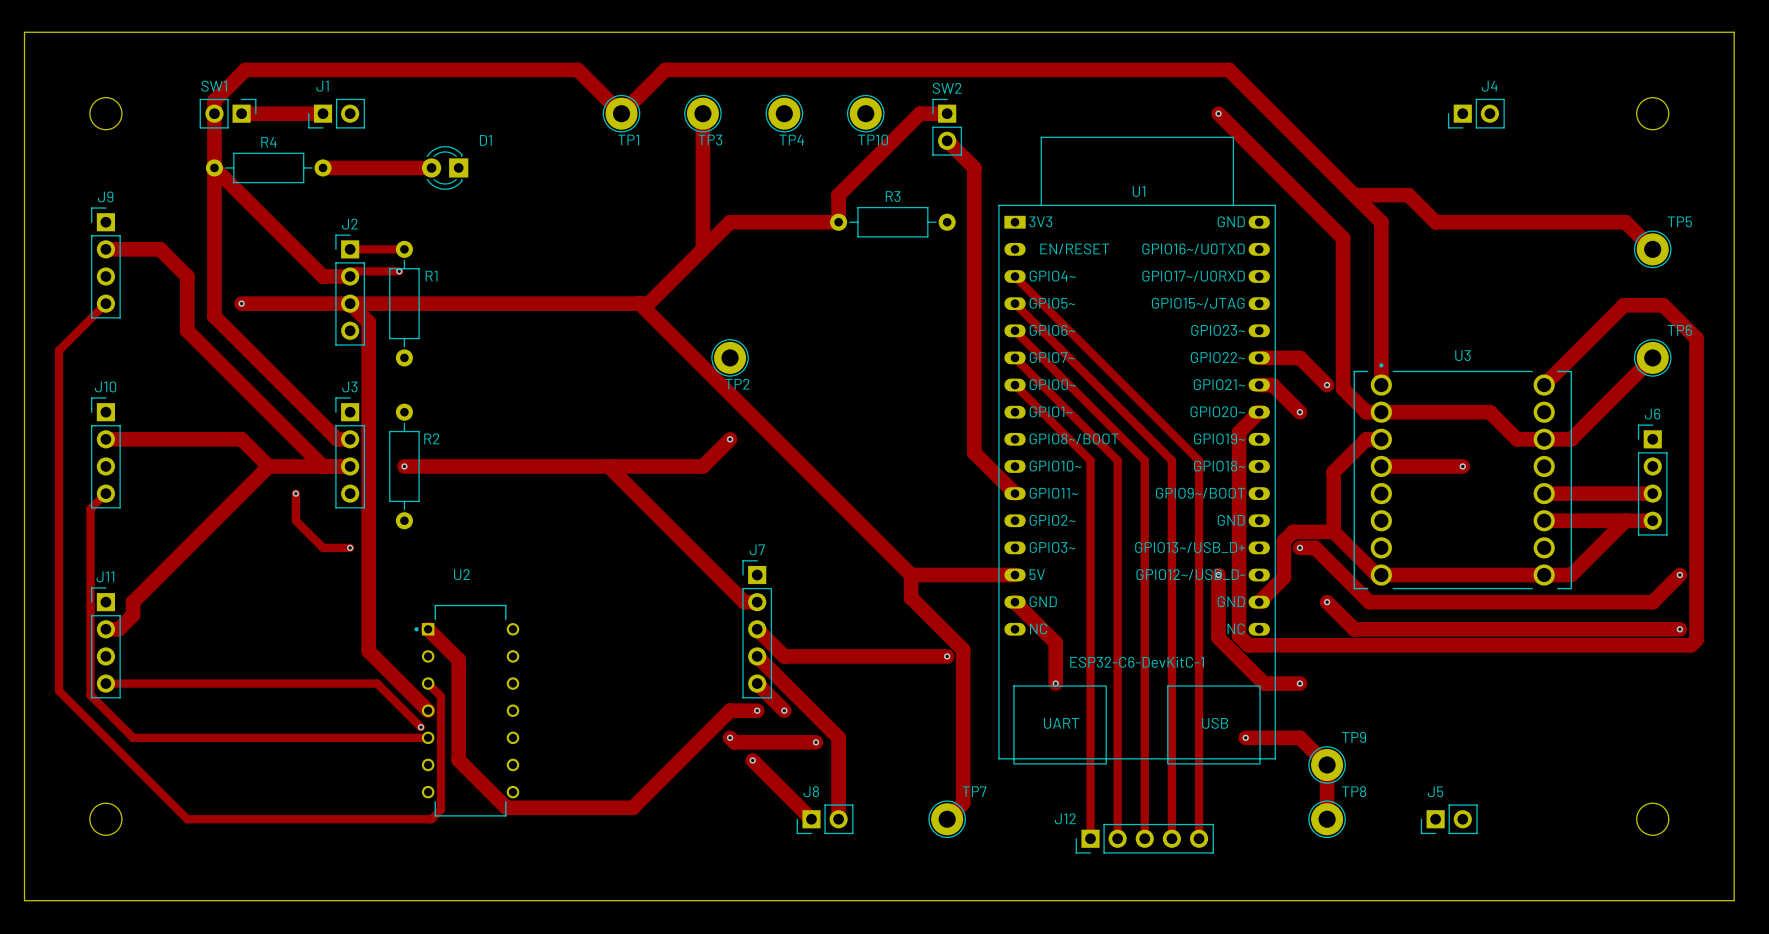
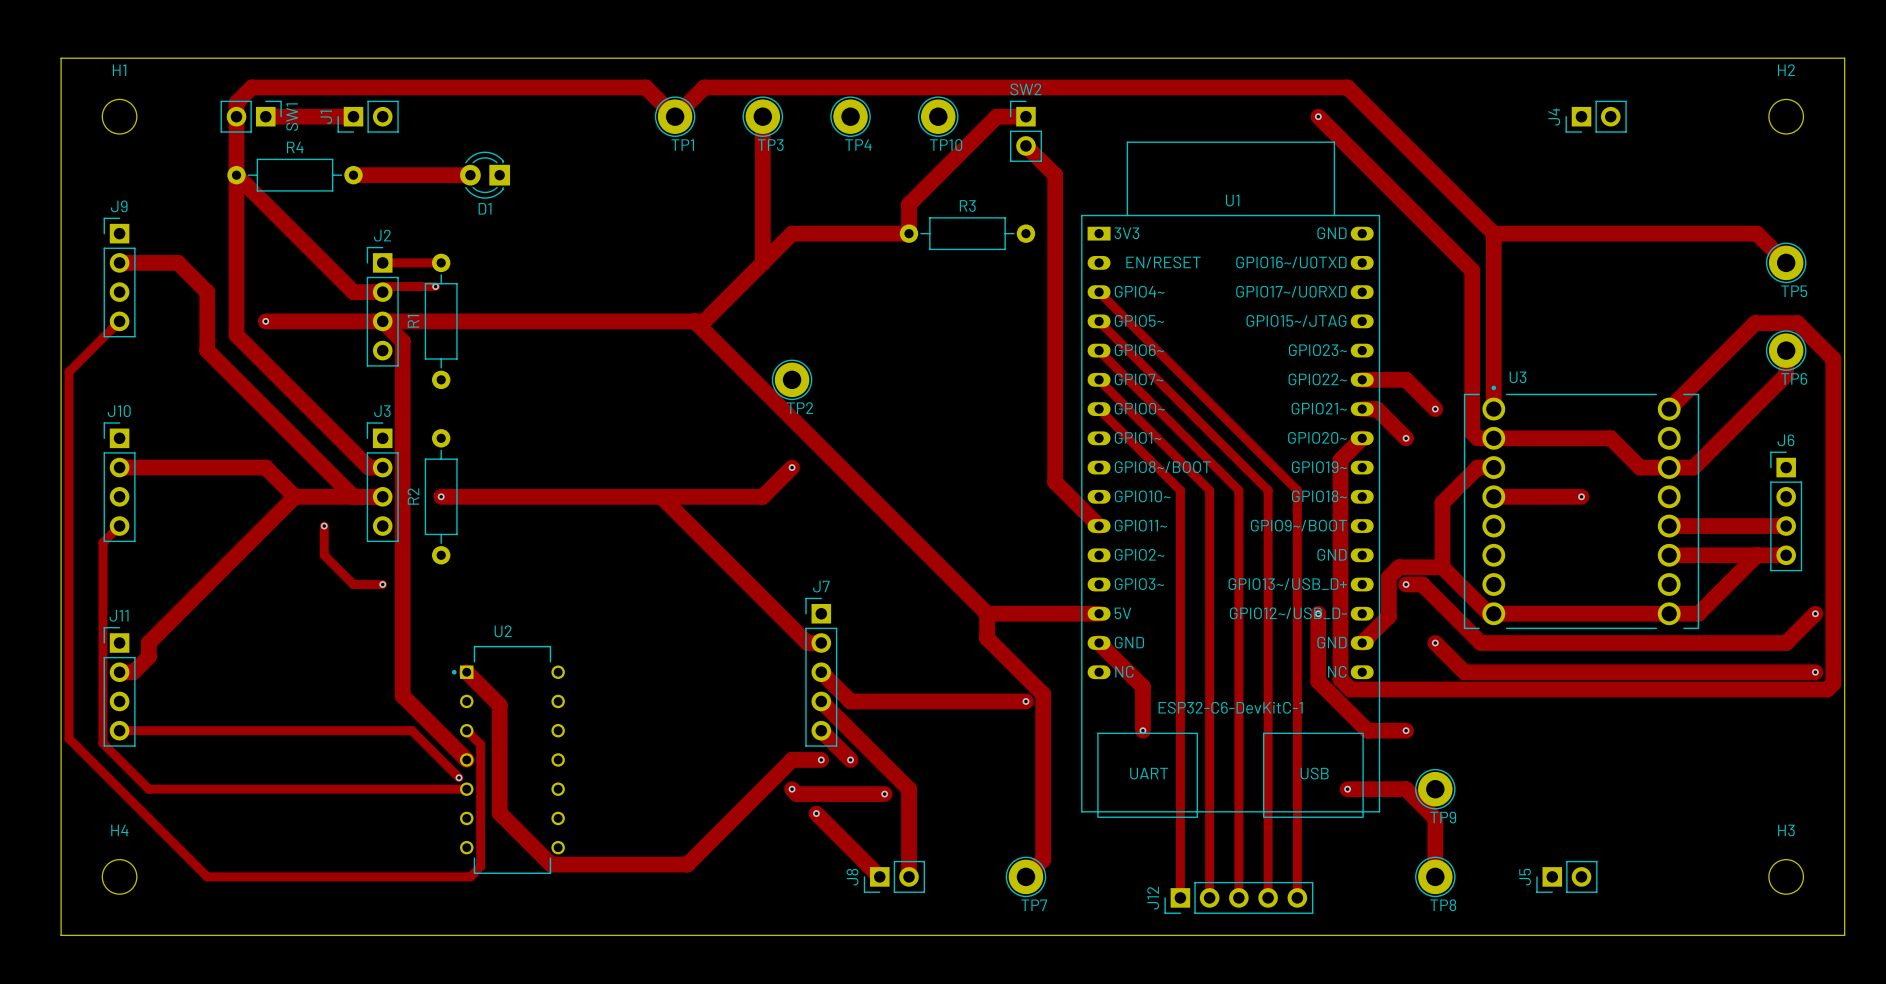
board edge: (24, 32) (1734, 32) (1734, 900) (24, 900) (24, 32) -> (61, 58) (61, 935) (1844, 935) (1844, 58) (61, 58)
H1 name: none -> H1 (119, 70)
H2 name: none -> H2 (1786, 70)
SW1 name rotation: 0° (214, 86) -> 90° counterclockwise (292, 117)
SW1 name position: SW1 (214, 86) -> SW1 (292, 117)
track: (228, 86) (245, 69) (577, 69) (594, 86) -> (251, 87) (645, 87)
J1 name rotation: 0° (322, 86) -> 90° counterclockwise (326, 117)
J1 name position: J1 (322, 86) -> J1 (326, 117)
track: (648, 86) (665, 69) (1229, 69) (1245, 86) -> (704, 87) (1347, 87)
J4 name rotation: 0° (1489, 86) -> 90° counterclockwise (1554, 116)
J4 name position: J4 (1489, 86) -> J4 (1554, 116)
D1 name position: D1 (485, 140) -> D1 (485, 208)
track: (1354, 195) (1408, 195) (1435, 222) -> (1493, 233) (1552, 233)
TP5 name position: TP5 (1679, 221) -> TP5 (1794, 291)
track: (1343, 238) (1343, 388) (1361, 407) -> (1452, 250) (1472, 270) (1472, 432)
R1 name rotation: 0° (431, 276) -> 90° counterclockwise (413, 321)
R1 name position: R1 (431, 276) -> R1 (413, 321)
TP6 name position: TP6 (1679, 330) -> TP6 (1794, 378)
U3 name position: U3 (1462, 355) -> U3 (1517, 377)
track: (1652, 357) (1571, 439) (1566, 439) -> (1786, 350) (1786, 375) (1693, 467)
TP6 position: (1652, 357) -> (1786, 350)
R2 name rotation: 0° (431, 438) -> 90° counterclockwise (413, 496)
R2 name position: R2 (431, 438) -> R2 (413, 496)
U2 name position: U2 (461, 574) -> U2 (503, 631)
TP9 name position: TP9 (1354, 737) -> TP9 (1443, 817)
TP9 position: (1327, 764) -> (1435, 789)
H4 name: none -> H4 (119, 830)
H3 name: none -> H3 (1786, 830)
J8 name rotation: 0° (811, 791) -> 90° counterclockwise (852, 877)
J8 name position: J8 (811, 791) -> J8 (852, 877)
TP7 name position: TP7 (974, 791) -> TP7 (1034, 905)
TP8 name position: TP8 (1354, 791) -> TP8 (1443, 905)
J5 name rotation: 0° (1435, 791) -> 90° counterclockwise (1525, 877)
J5 name position: J5 (1435, 791) -> J5 (1525, 877)
J12 name rotation: 0° (1065, 818) -> 90° counterclockwise (1153, 898)

